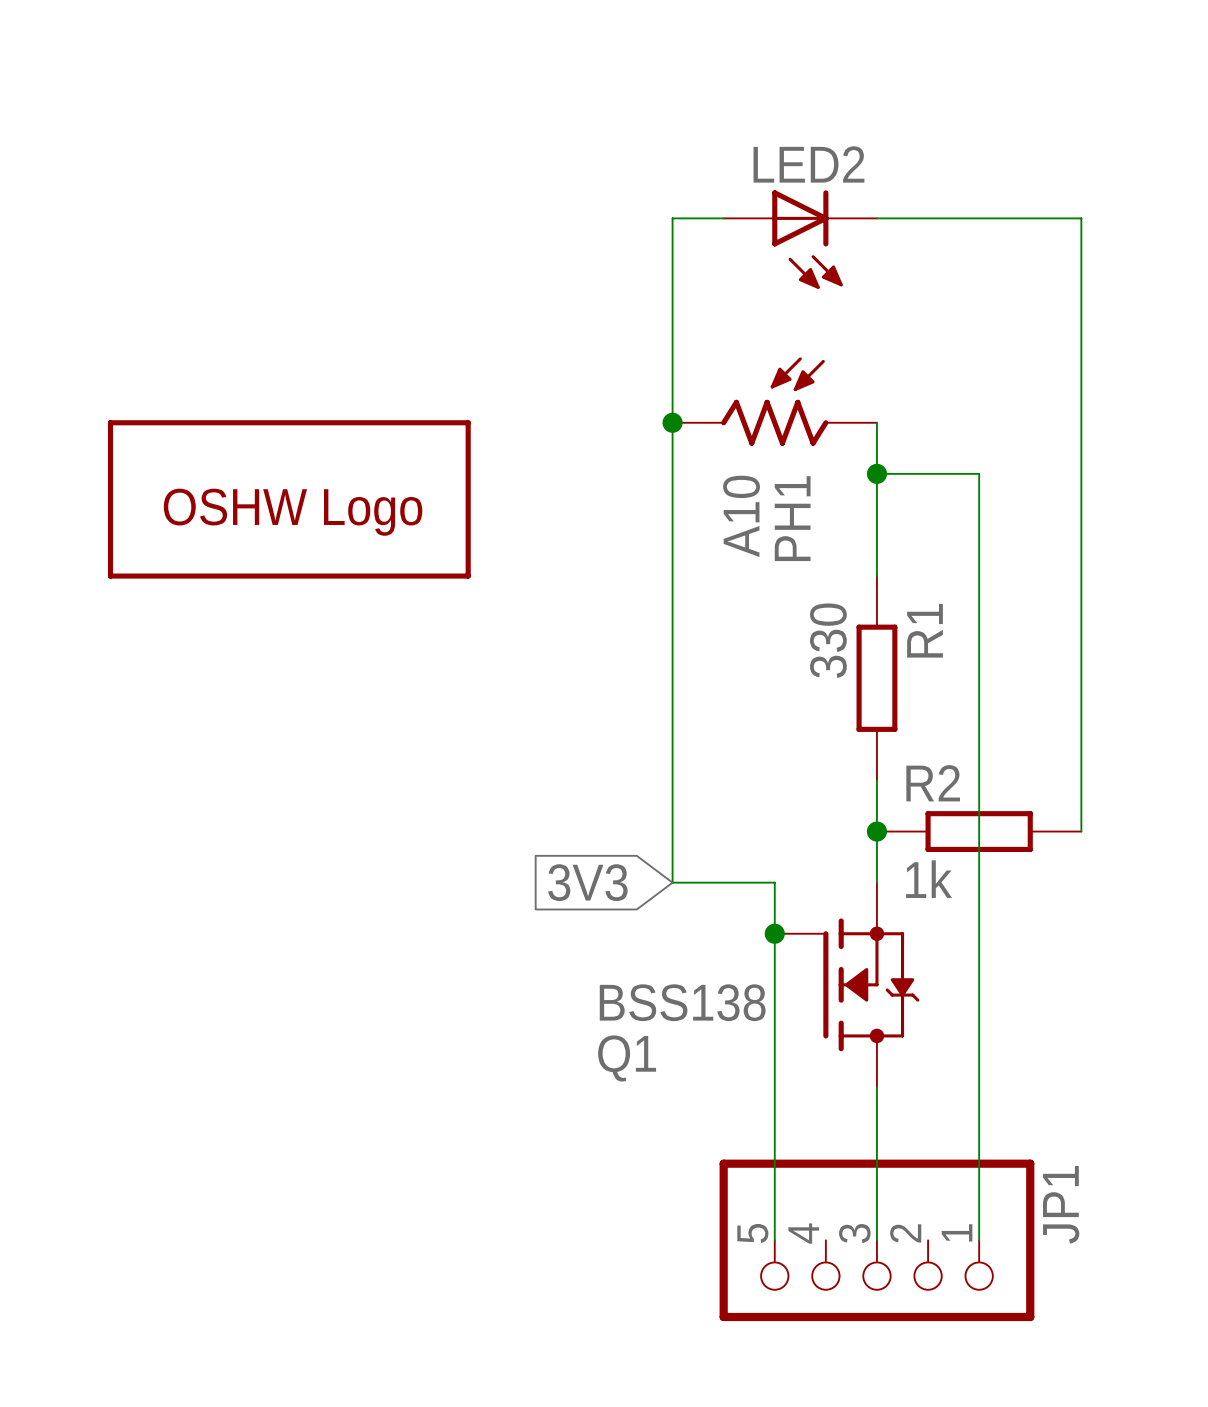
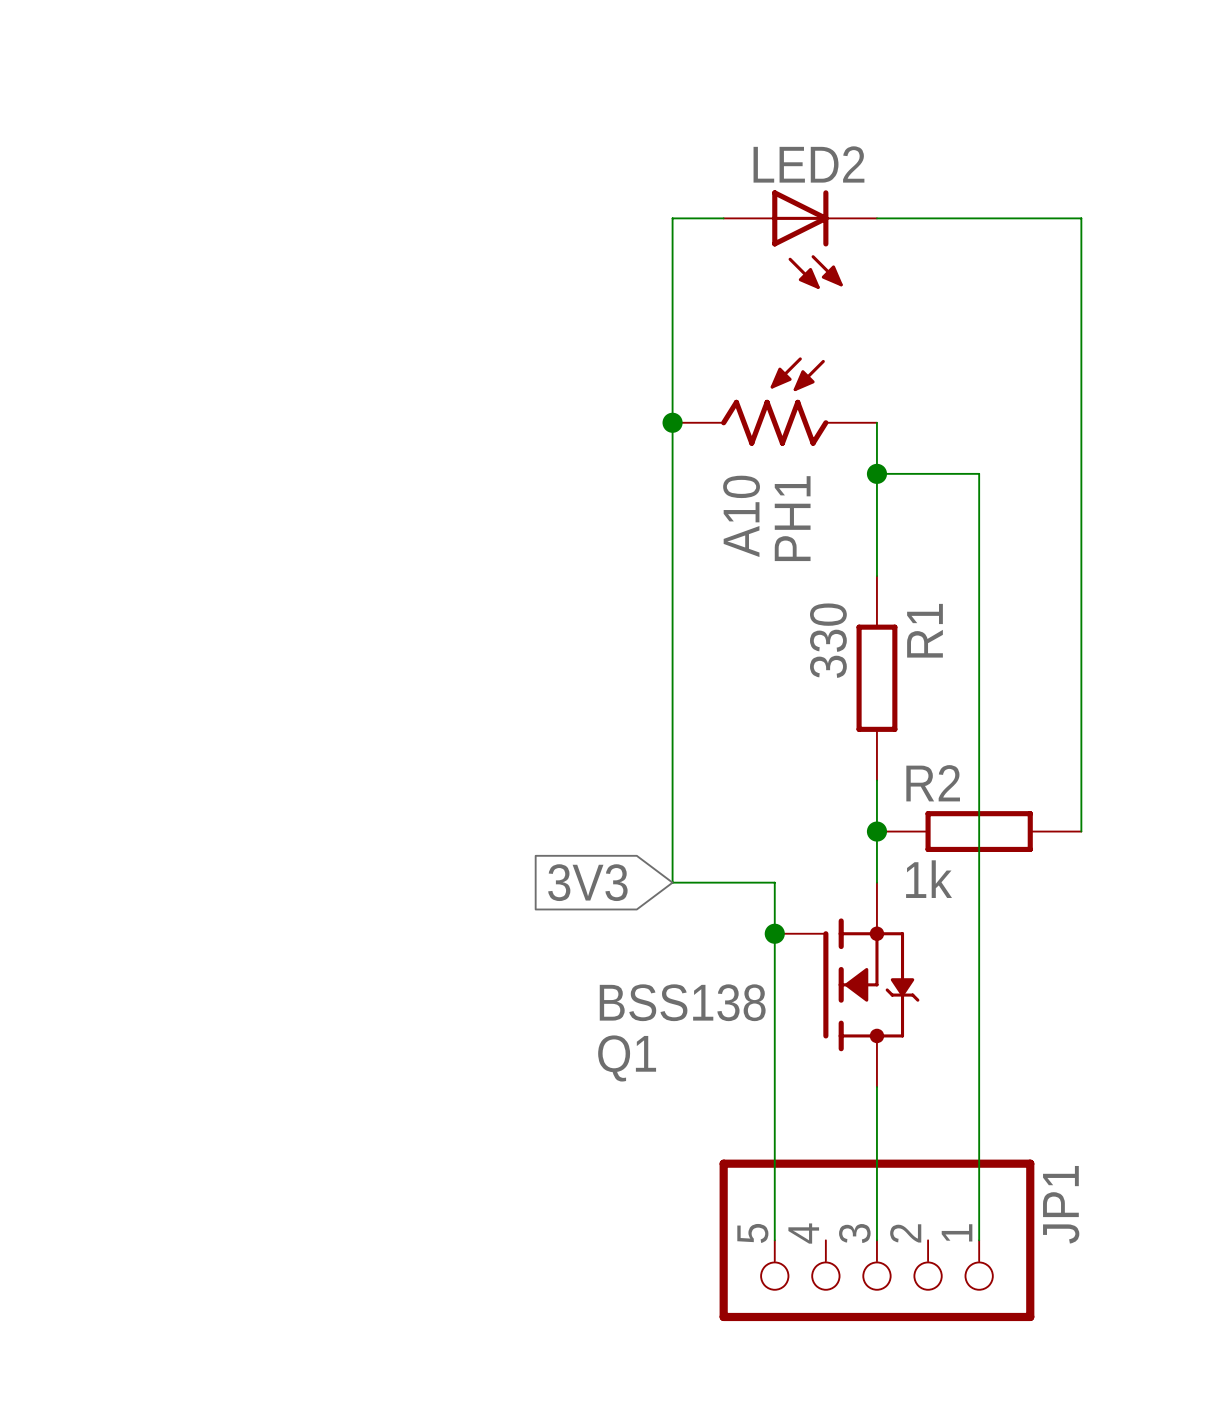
part: (289, 499) -> none

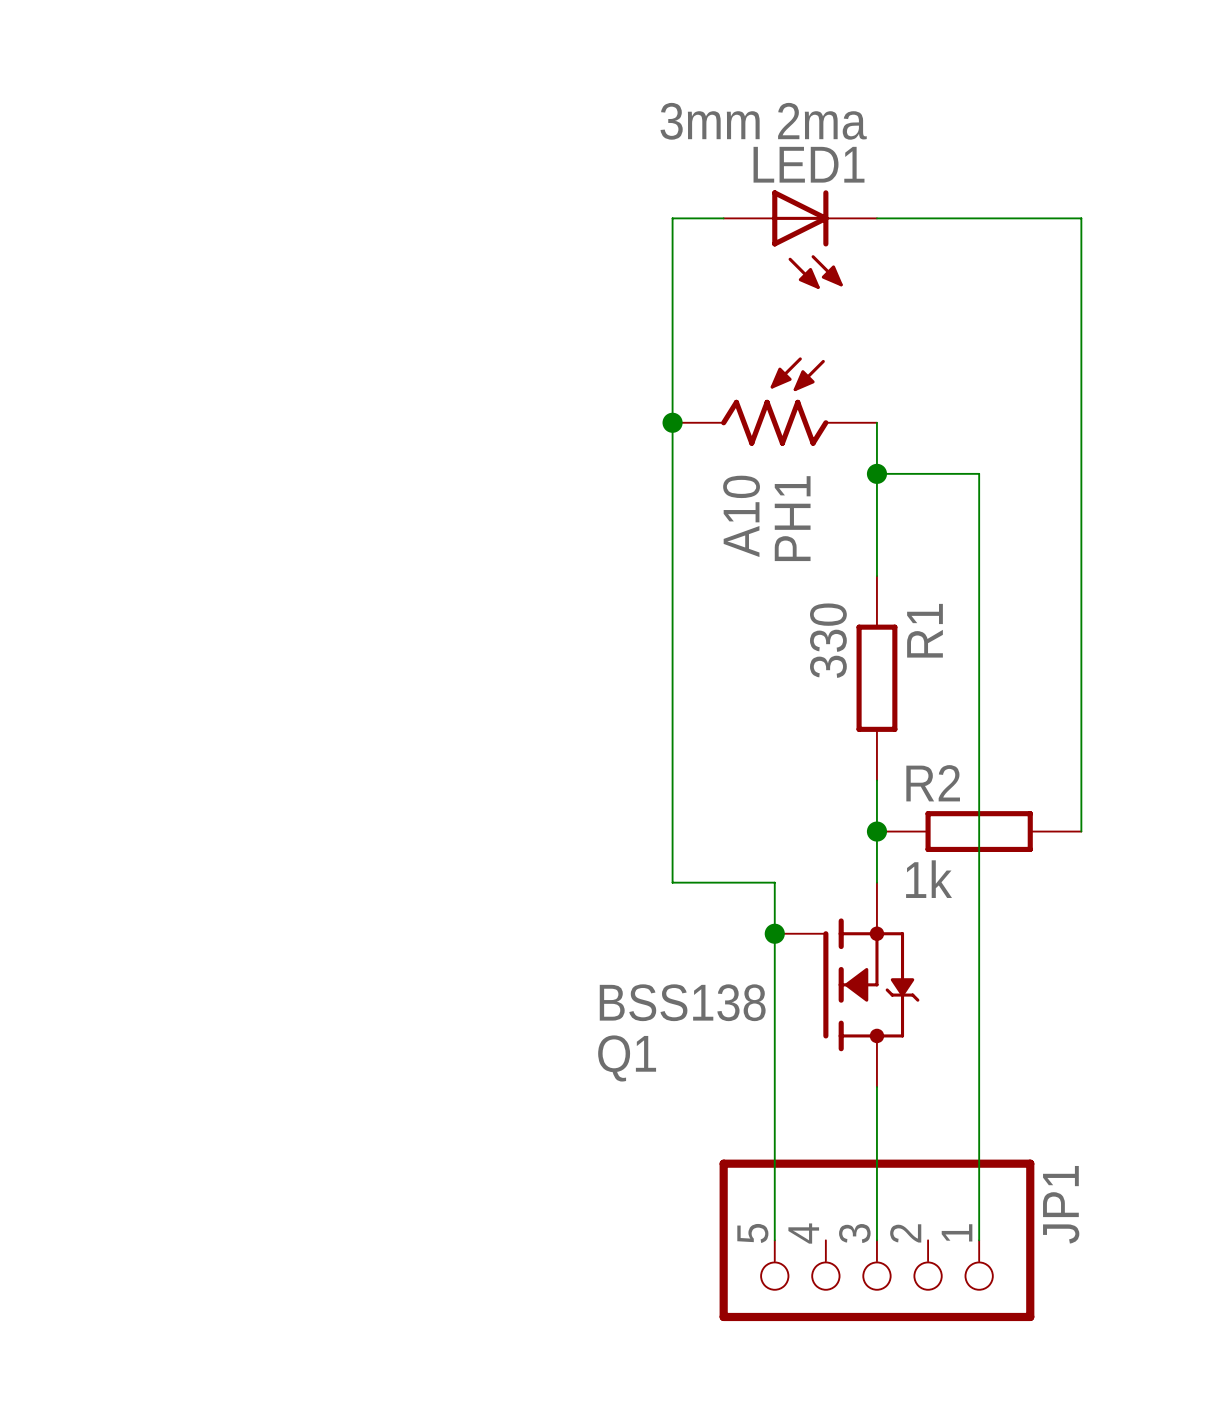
LED2 value: none -> 3mm 2ma (763, 121)
LED2 name: LED2 (808, 164) -> LED1 (809, 164)
global label: 3V3 (587, 882) -> none

